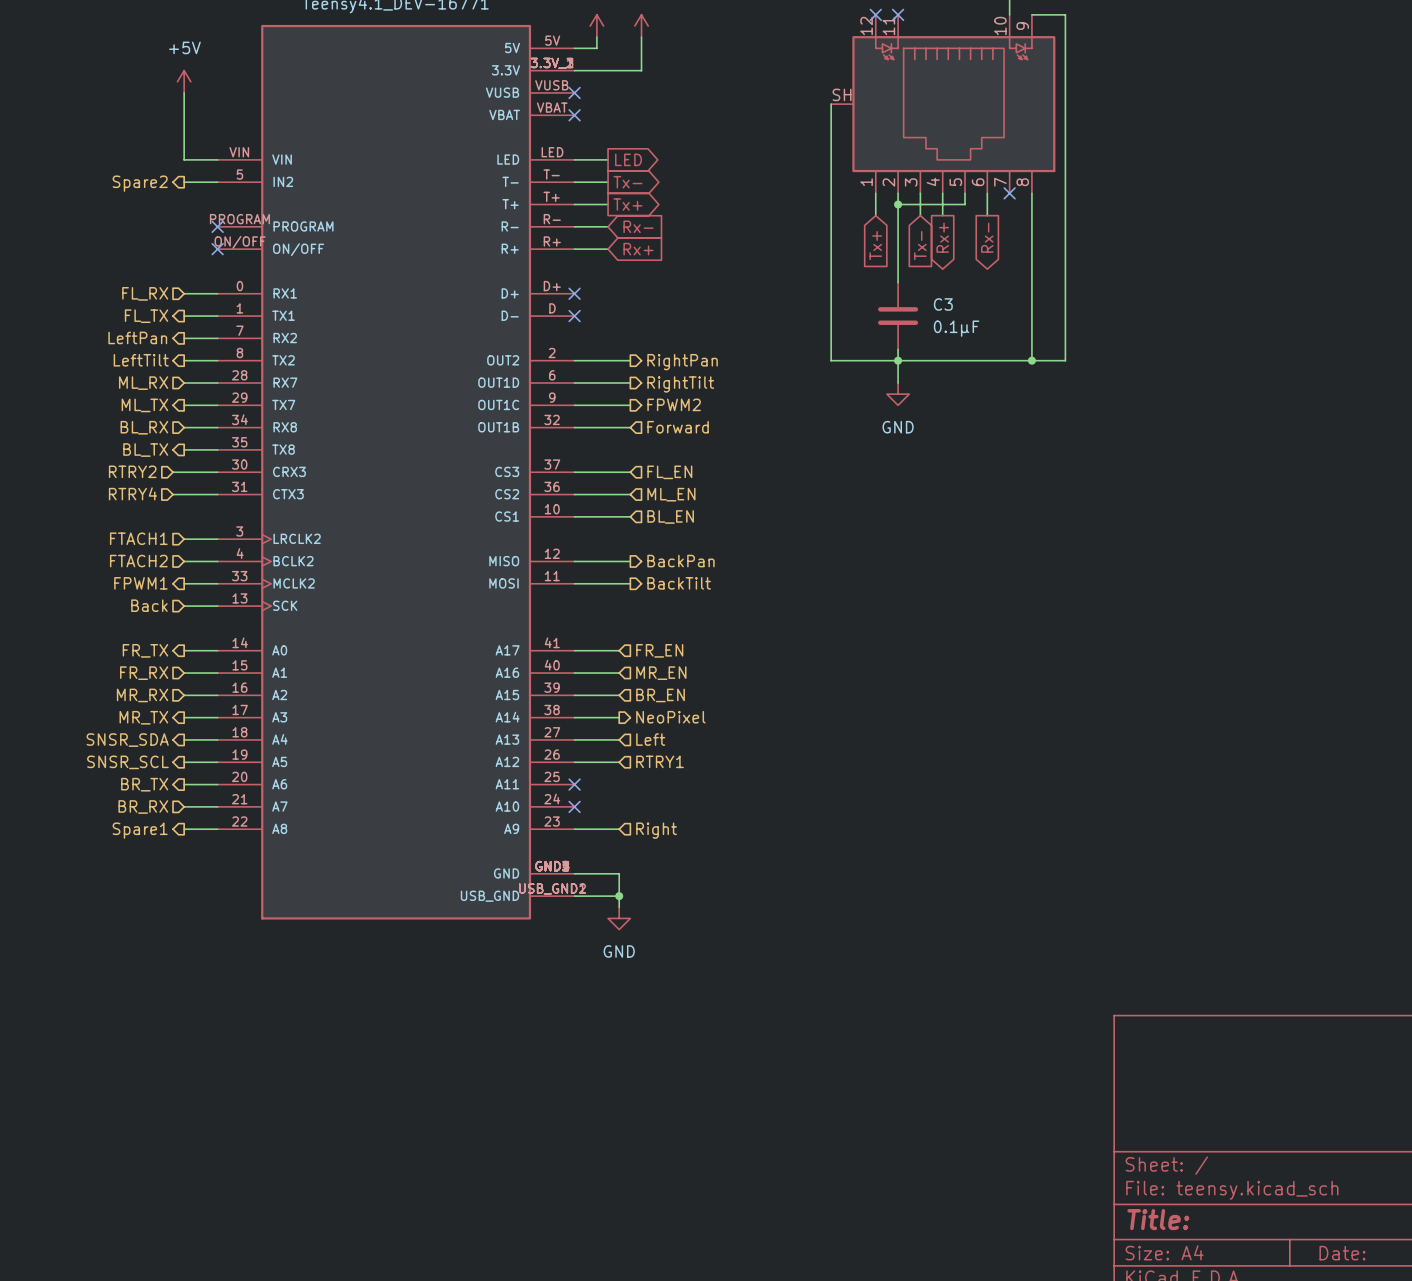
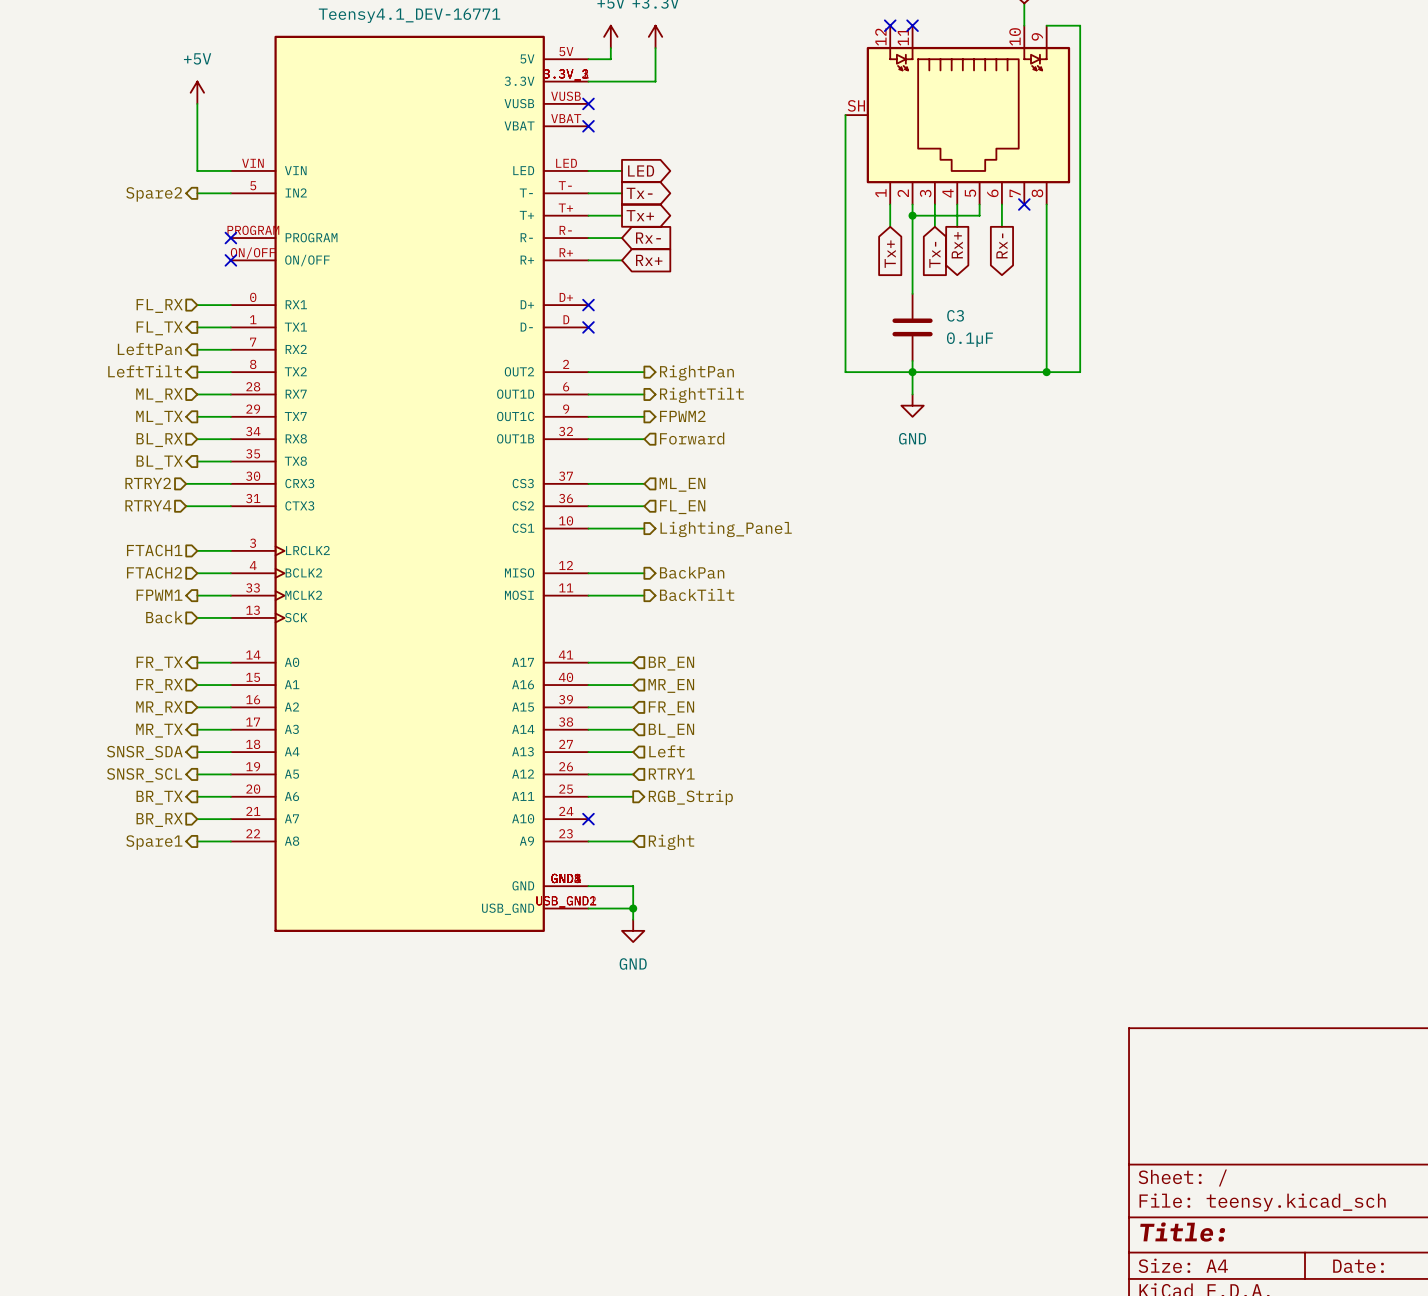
hierarchical label: FL_EN (669, 472) -> ML_EN (682, 484)
hierarchical label: ML_EN (671, 494) -> FL_EN (682, 507)
hierarchical label shape: input (670, 516) -> output (726, 529)
hierarchical label: BL_EN (670, 516) -> Lighting_Panel (726, 529)
hierarchical label: FR_EN (659, 650) -> BR_EN (671, 663)
hierarchical label: BR_EN (660, 695) -> FR_EN (671, 708)
hierarchical label shape: output (670, 717) -> input (671, 730)
hierarchical label: NeoPixel (670, 717) -> BL_EN (671, 730)
wire: none -> (588, 796) (633, 796)
no-connect mark: (574, 784) -> none
hierarchical label: none -> RGB_Strip (690, 797)

